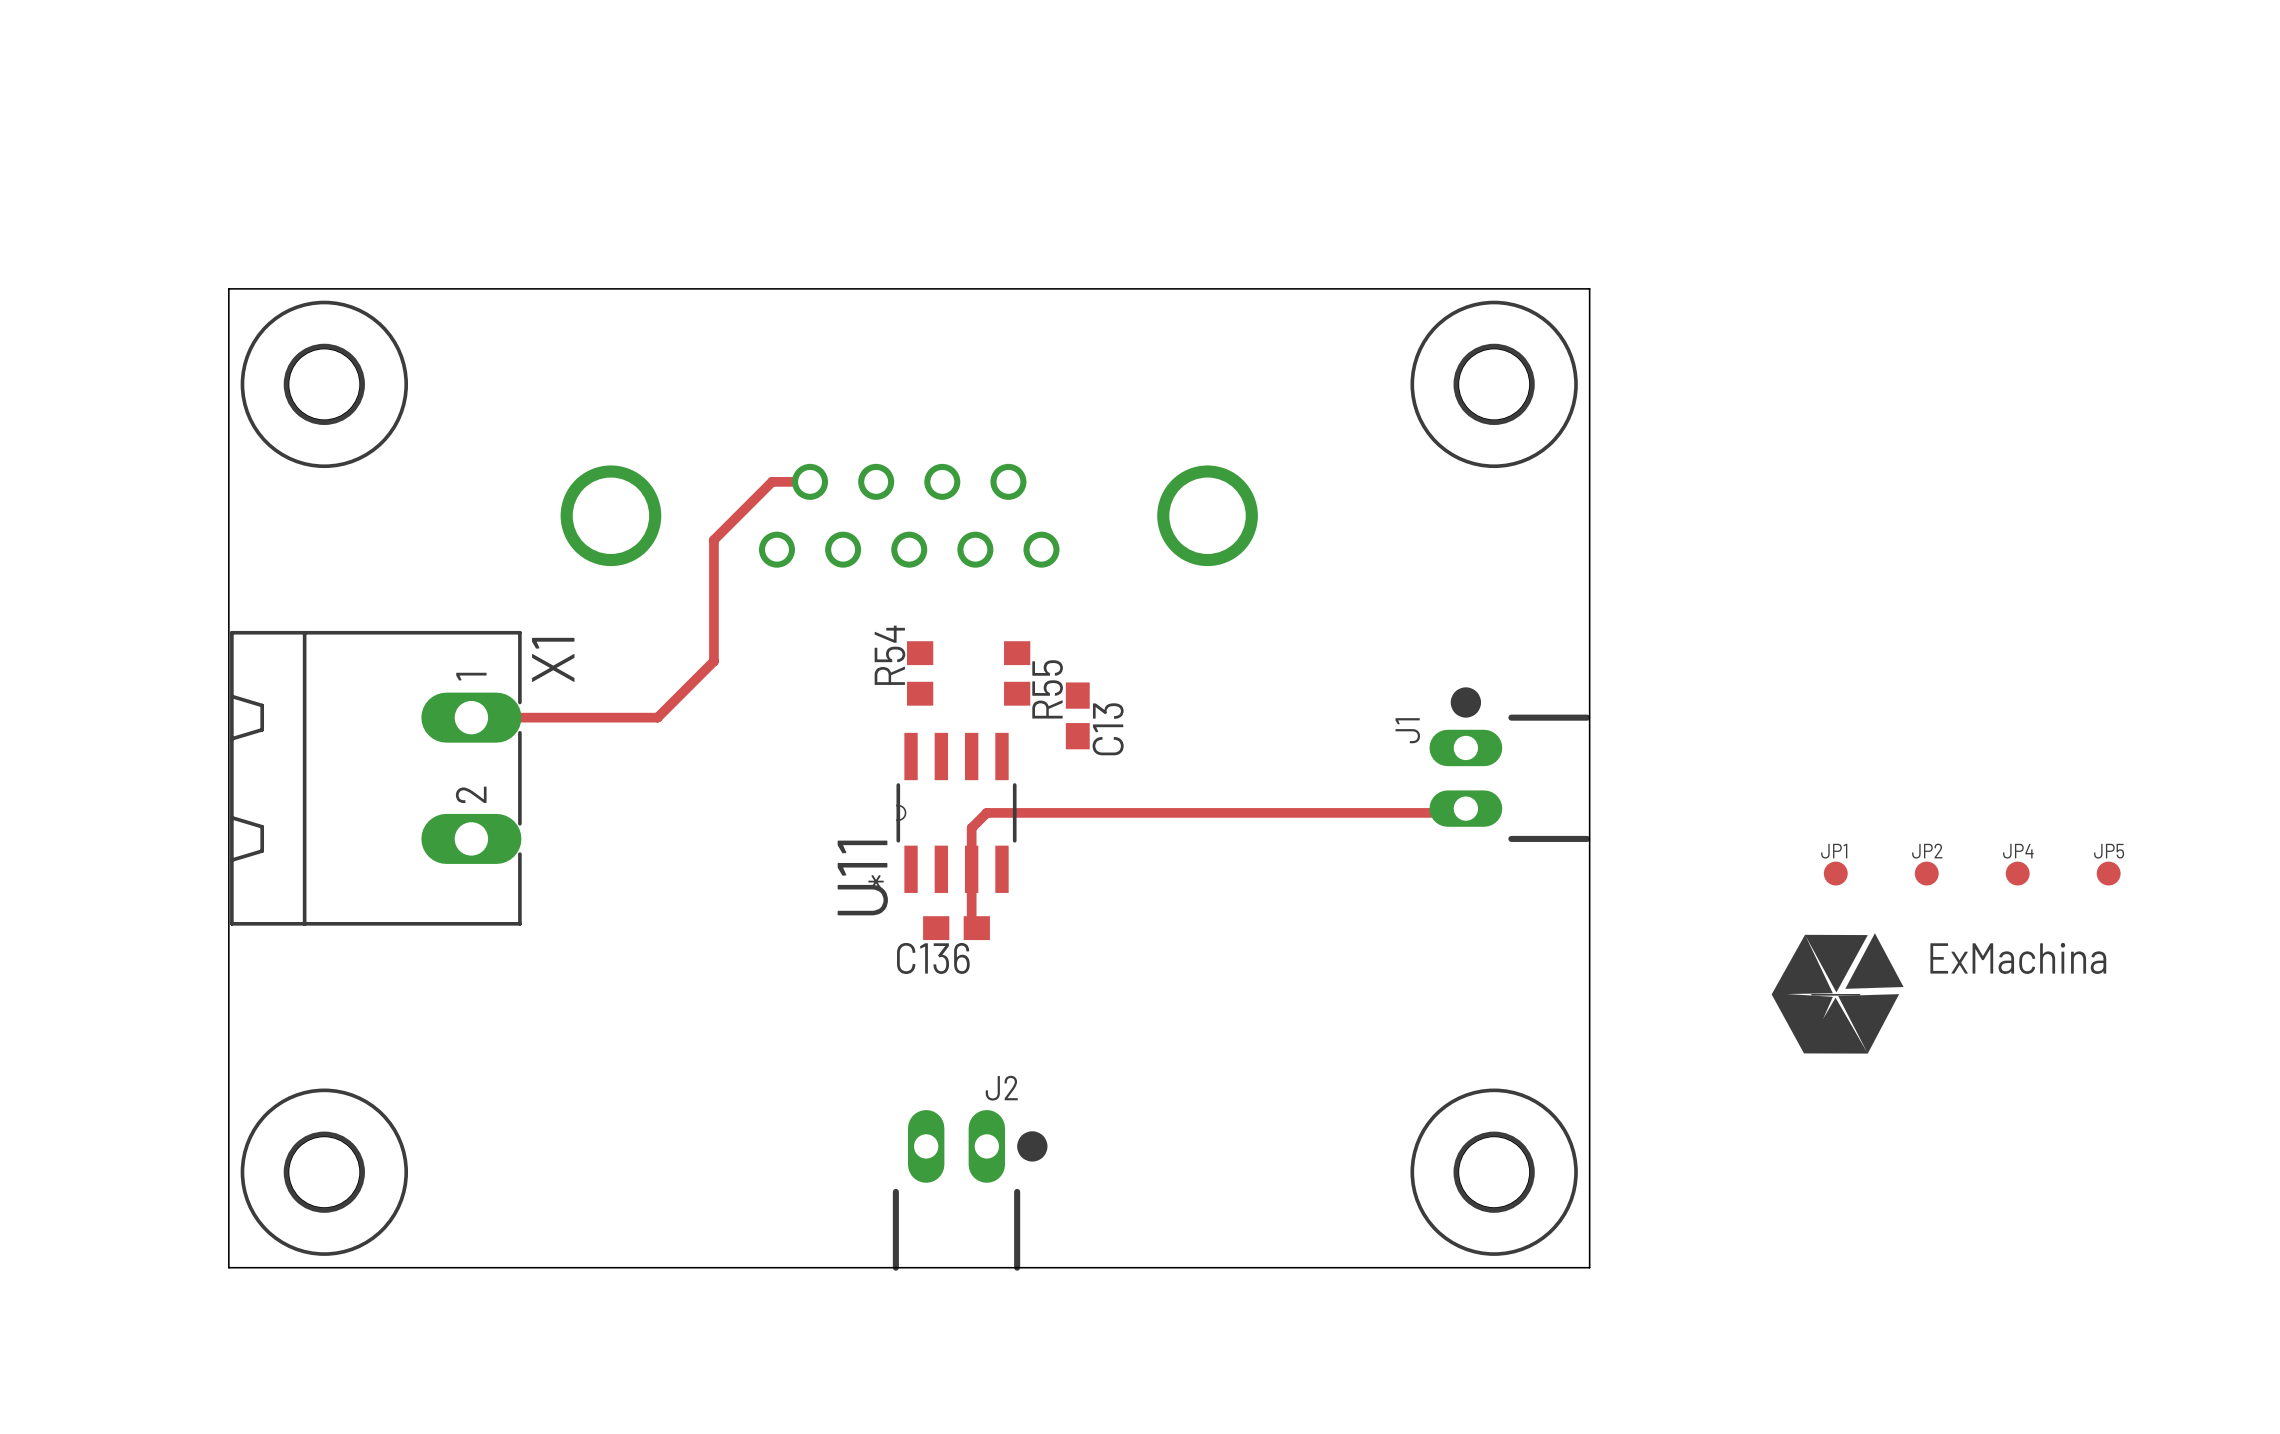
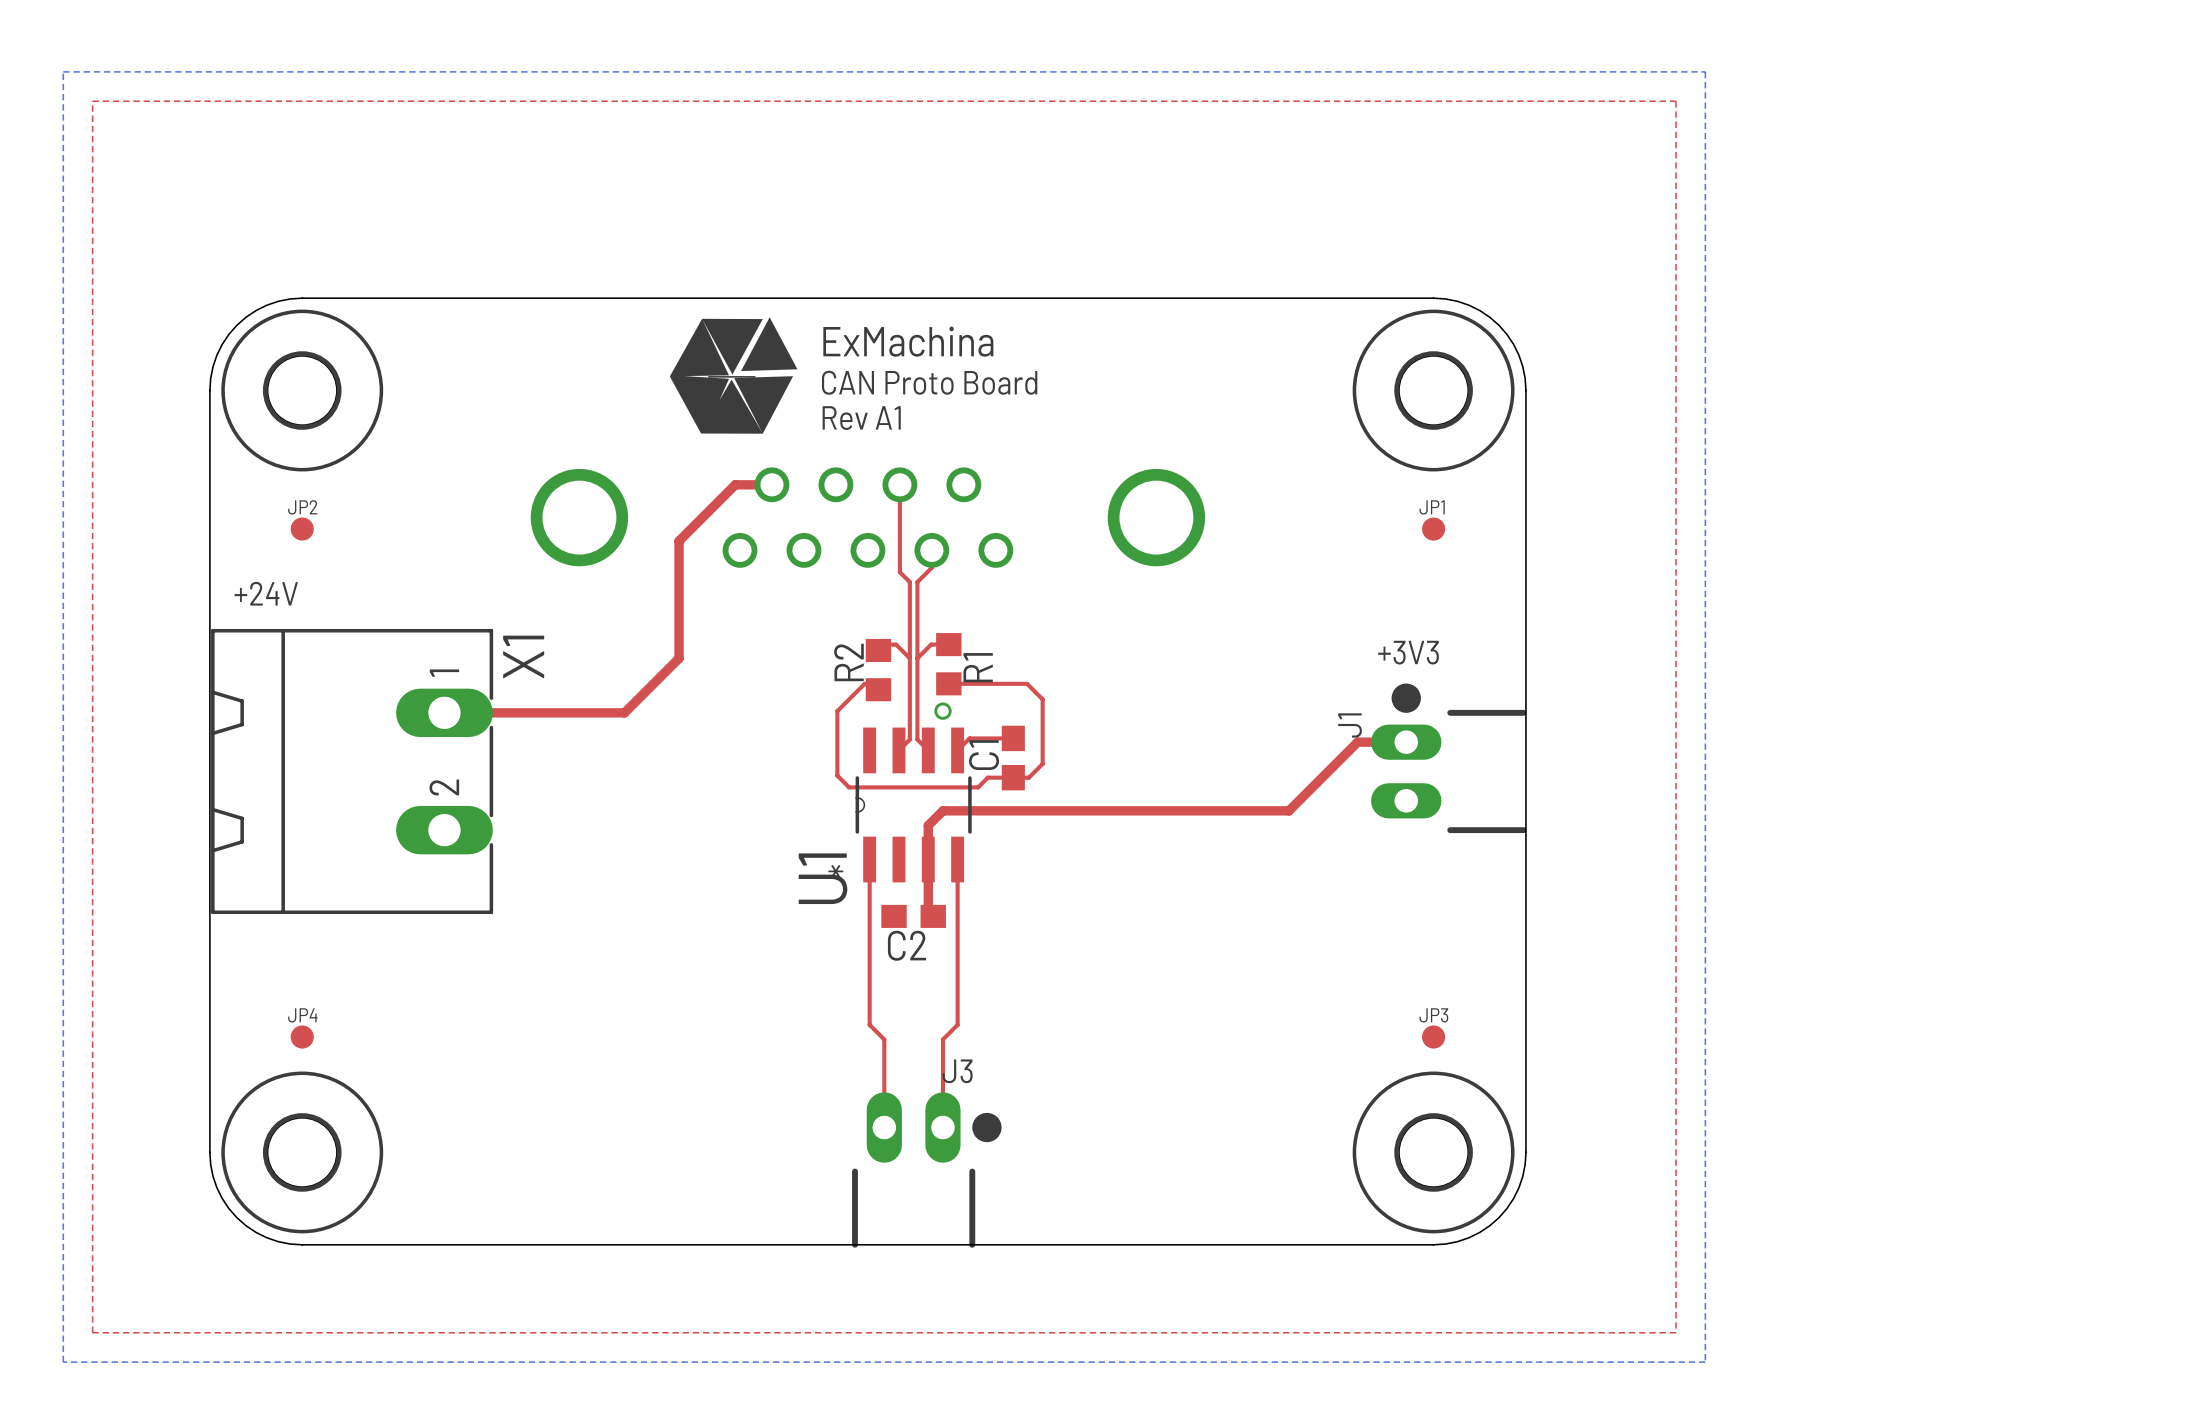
bottom zone outline: none -> (63, 71) (63, 1362) (1705, 1362) (1705, 71) (63, 71)
top zone outline: none -> (92, 101) (92, 1332) (1676, 1332) (1676, 101) (92, 101)
board edge: (324, 288) (228, 288) (228, 384) -> (302, 298) (290, 298) (266, 305) (256, 310) (236, 325) (222, 344) (216, 355) (210, 378) (209, 390)
board edge: (1494, 288) (1589, 288) (1589, 384) -> (1433, 298) (1445, 298) (1468, 305) (1479, 310) (1498, 325) (1513, 344) (1518, 355) (1525, 378) (1525, 390)
drawing: none -> [669, 317, 798, 434]
text: none -> CAN Proto Board (929, 382)
text: none -> Rev A1 (861, 418)
top track: none -> (899, 484) (899, 572) (909, 582) (909, 739) (898, 750)
top track: none -> (931, 550) (931, 567) (917, 582) (917, 739) (928, 750)
text: none -> +24V (266, 593)
top track: none -> (878, 644) (896, 644) (909, 658)
top track: none -> (948, 644) (931, 644) (917, 658)
R54 name: R54 (889, 655) -> R2 (848, 662)
text: none -> +3V3 (1408, 652)
R1: none -> (948, 664)
R55: (1017, 673) -> none
top track: none -> (878, 683) (864, 683) (837, 711) (837, 775) (849, 787) (978, 787) (987, 777) (1028, 777) (1042, 763) (1042, 699) (1027, 683) (948, 683)
via: none -> (942, 711)
C13: (1077, 715) -> none
top track: none -> (1013, 738) (969, 738) (957, 750)
C1: none -> (1013, 758)
top track: (1465, 808) (1461, 812) (986, 812) (971, 828) (971, 834) -> (1406, 742) (1357, 742) (1288, 810) (942, 810) (928, 825)
top track: none -> (869, 859) (869, 1024) (884, 1039) (884, 1127)
top track: none -> (957, 859) (957, 1024) (942, 1039) (942, 1127)
JP1 position: (1835, 873) -> (1433, 529)
JP2 position: (1926, 873) -> (302, 529)
JP4 position: (2017, 873) -> (302, 1037)
JP5: (2108, 873) -> none
U11 name: U11 (862, 877) -> U1 (823, 878)
drawing: [1771, 933, 1904, 1054] -> none
C136 name: C136 (933, 958) -> C2 (907, 945)
JP3: none -> (1433, 1037)
J2 name: J2 (1001, 1088) -> J3 (957, 1071)
board edge: (228, 1172) (228, 1267) (324, 1267) -> (209, 1152) (210, 1164) (216, 1187) (222, 1198) (236, 1217) (256, 1232) (266, 1237) (290, 1244) (302, 1244)
board edge: (1589, 1172) (1589, 1267) (1494, 1267) -> (1525, 1152) (1525, 1164) (1518, 1187) (1513, 1198) (1498, 1217) (1479, 1232) (1468, 1237) (1445, 1244) (1433, 1244)

